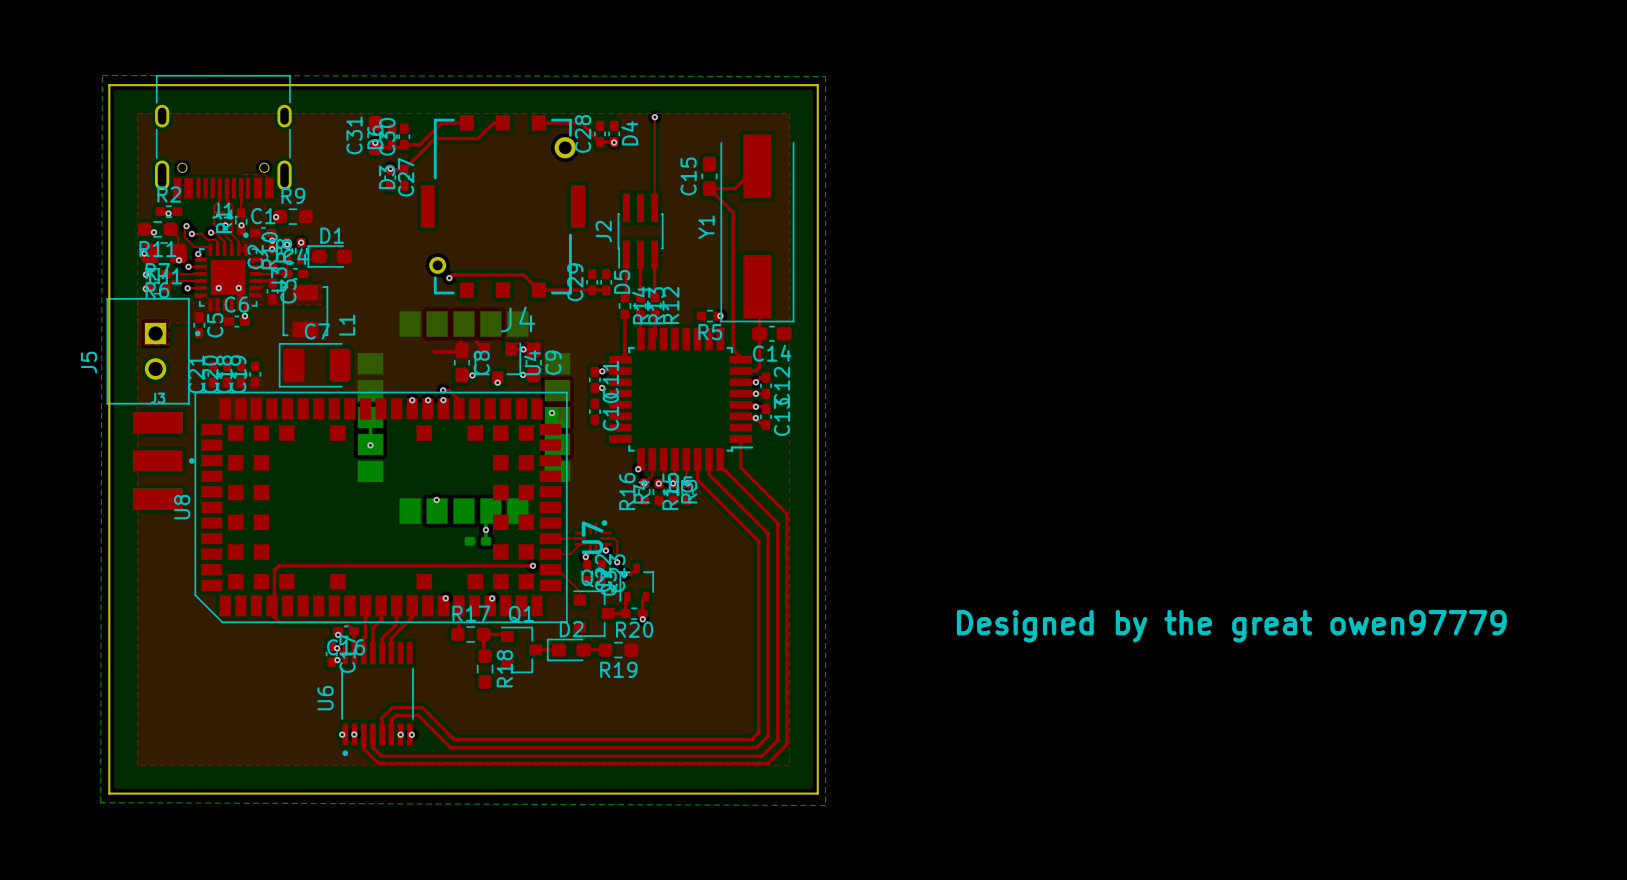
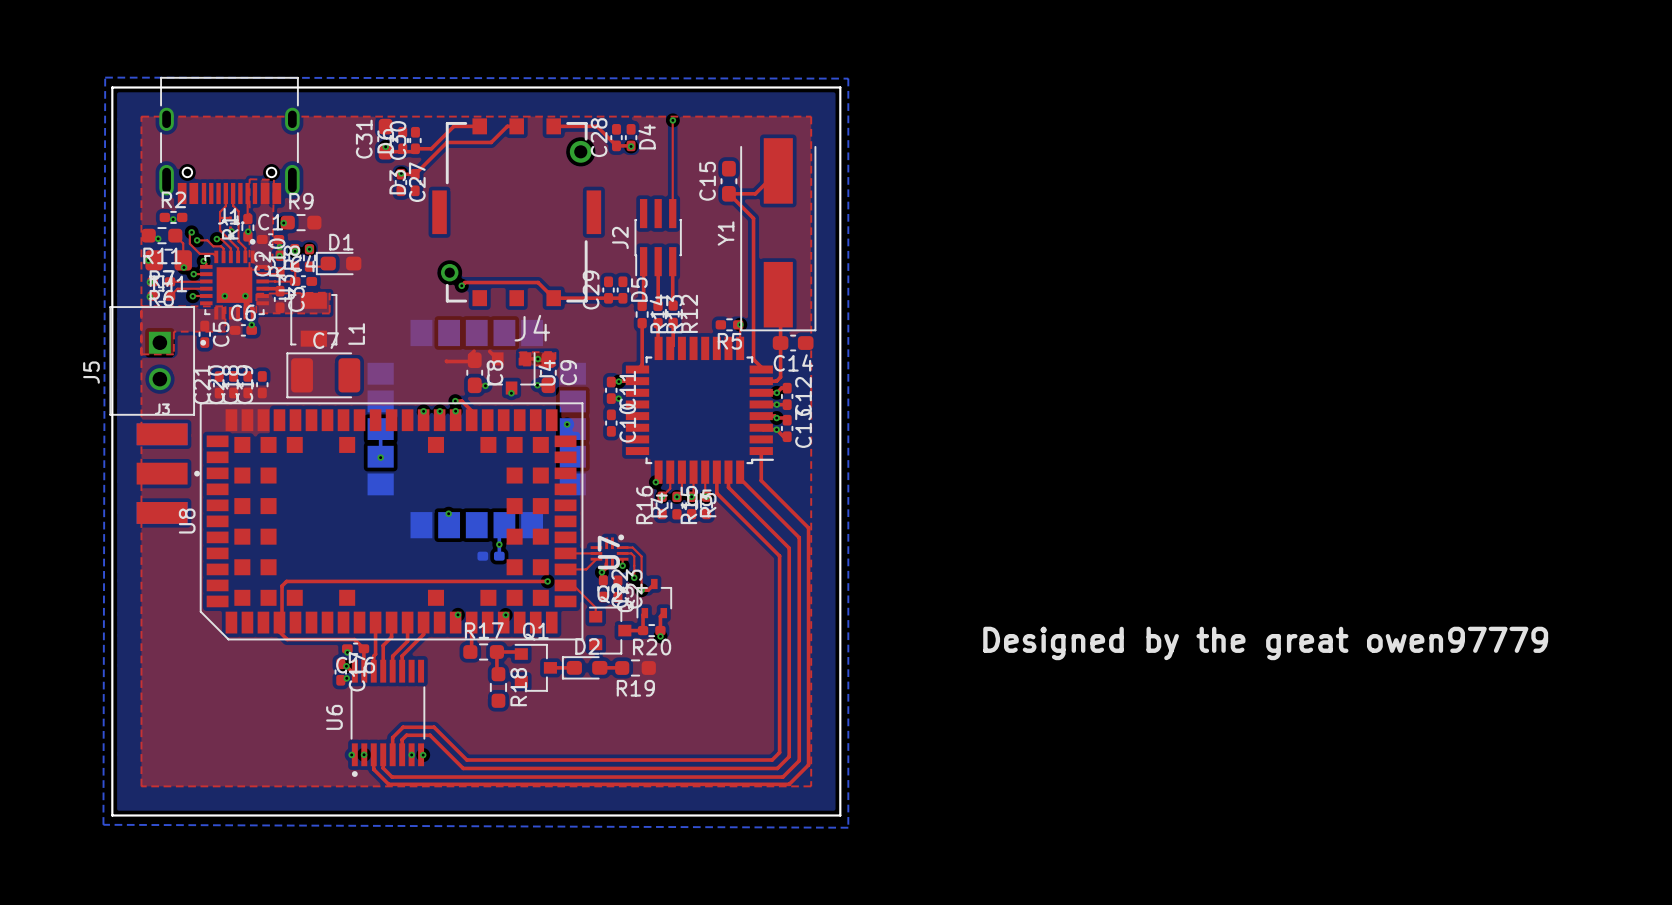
top track: none -> (622, 547) (632, 547) (641, 556) (641, 590)

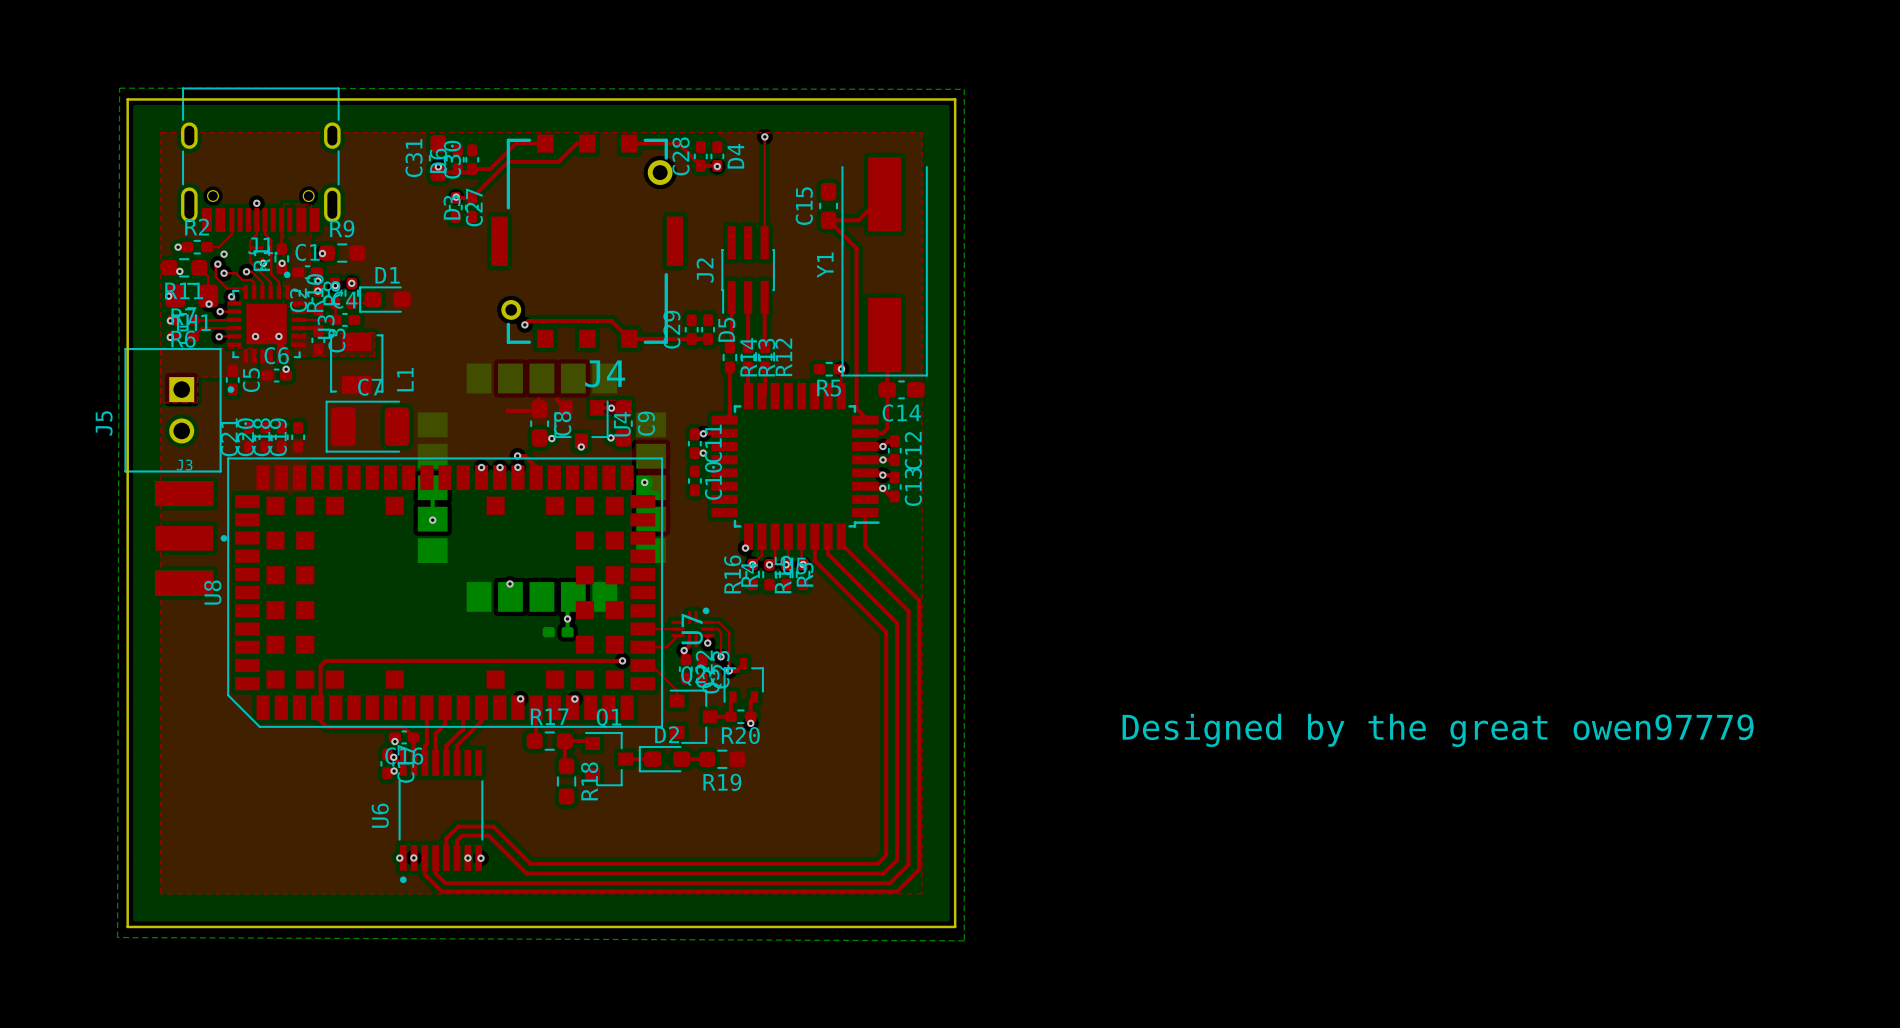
via: none -> (256, 203)
top track: none -> (231, 219) (231, 234) (219, 247) (207, 247)
via: none -> (178, 247)
via: (173, 219) -> none
via: none -> (224, 254)

